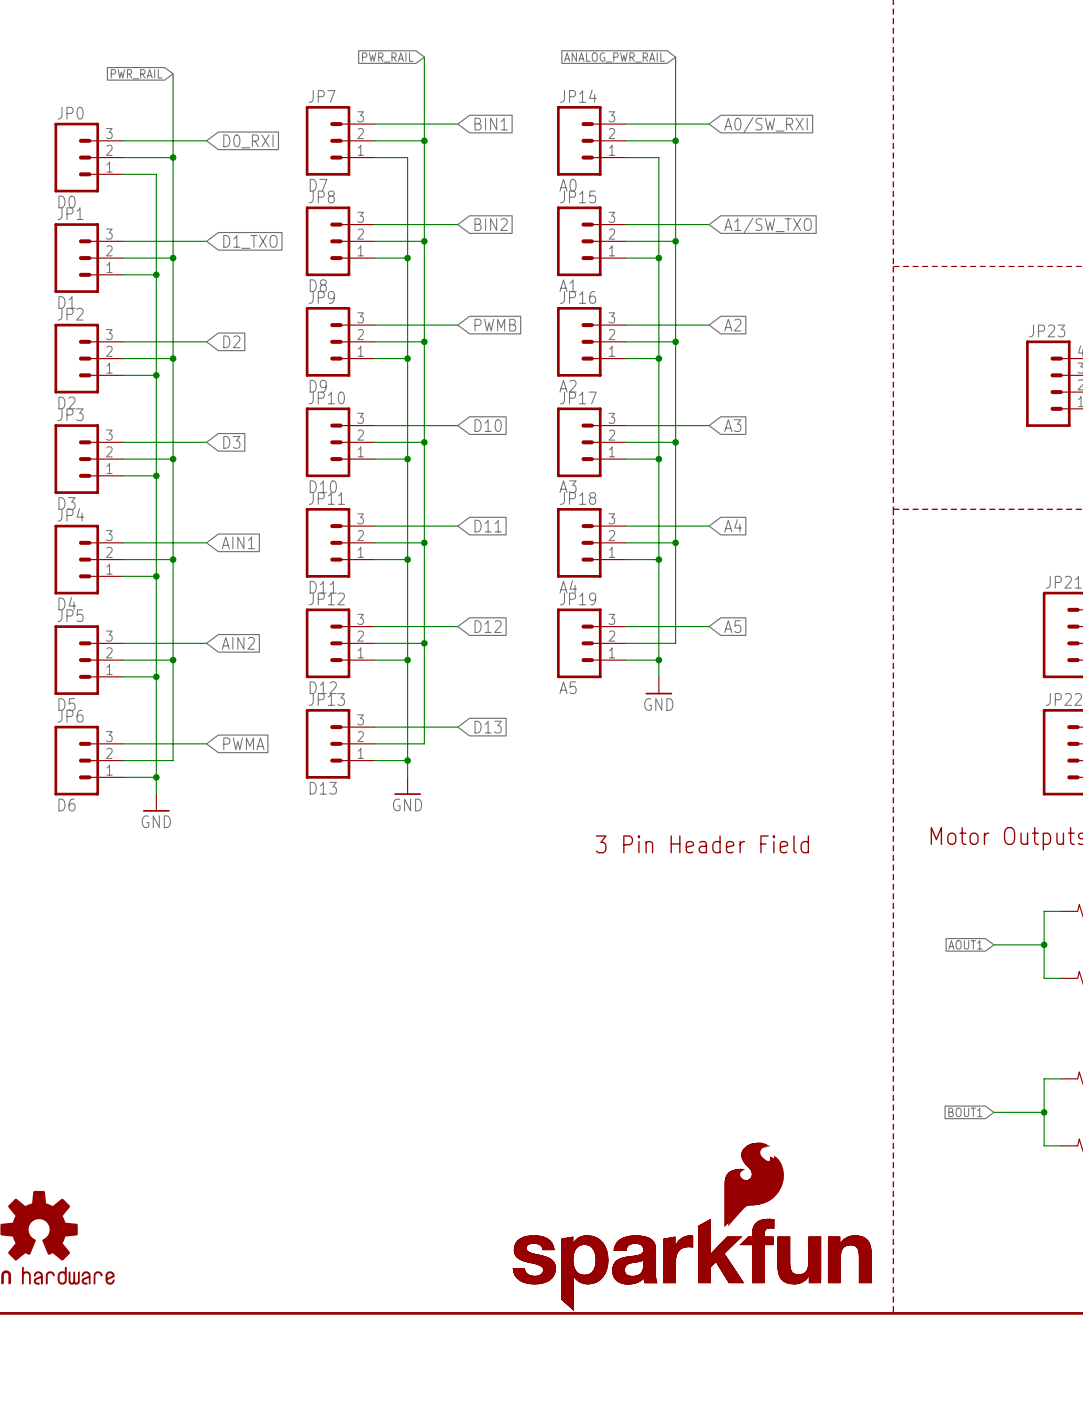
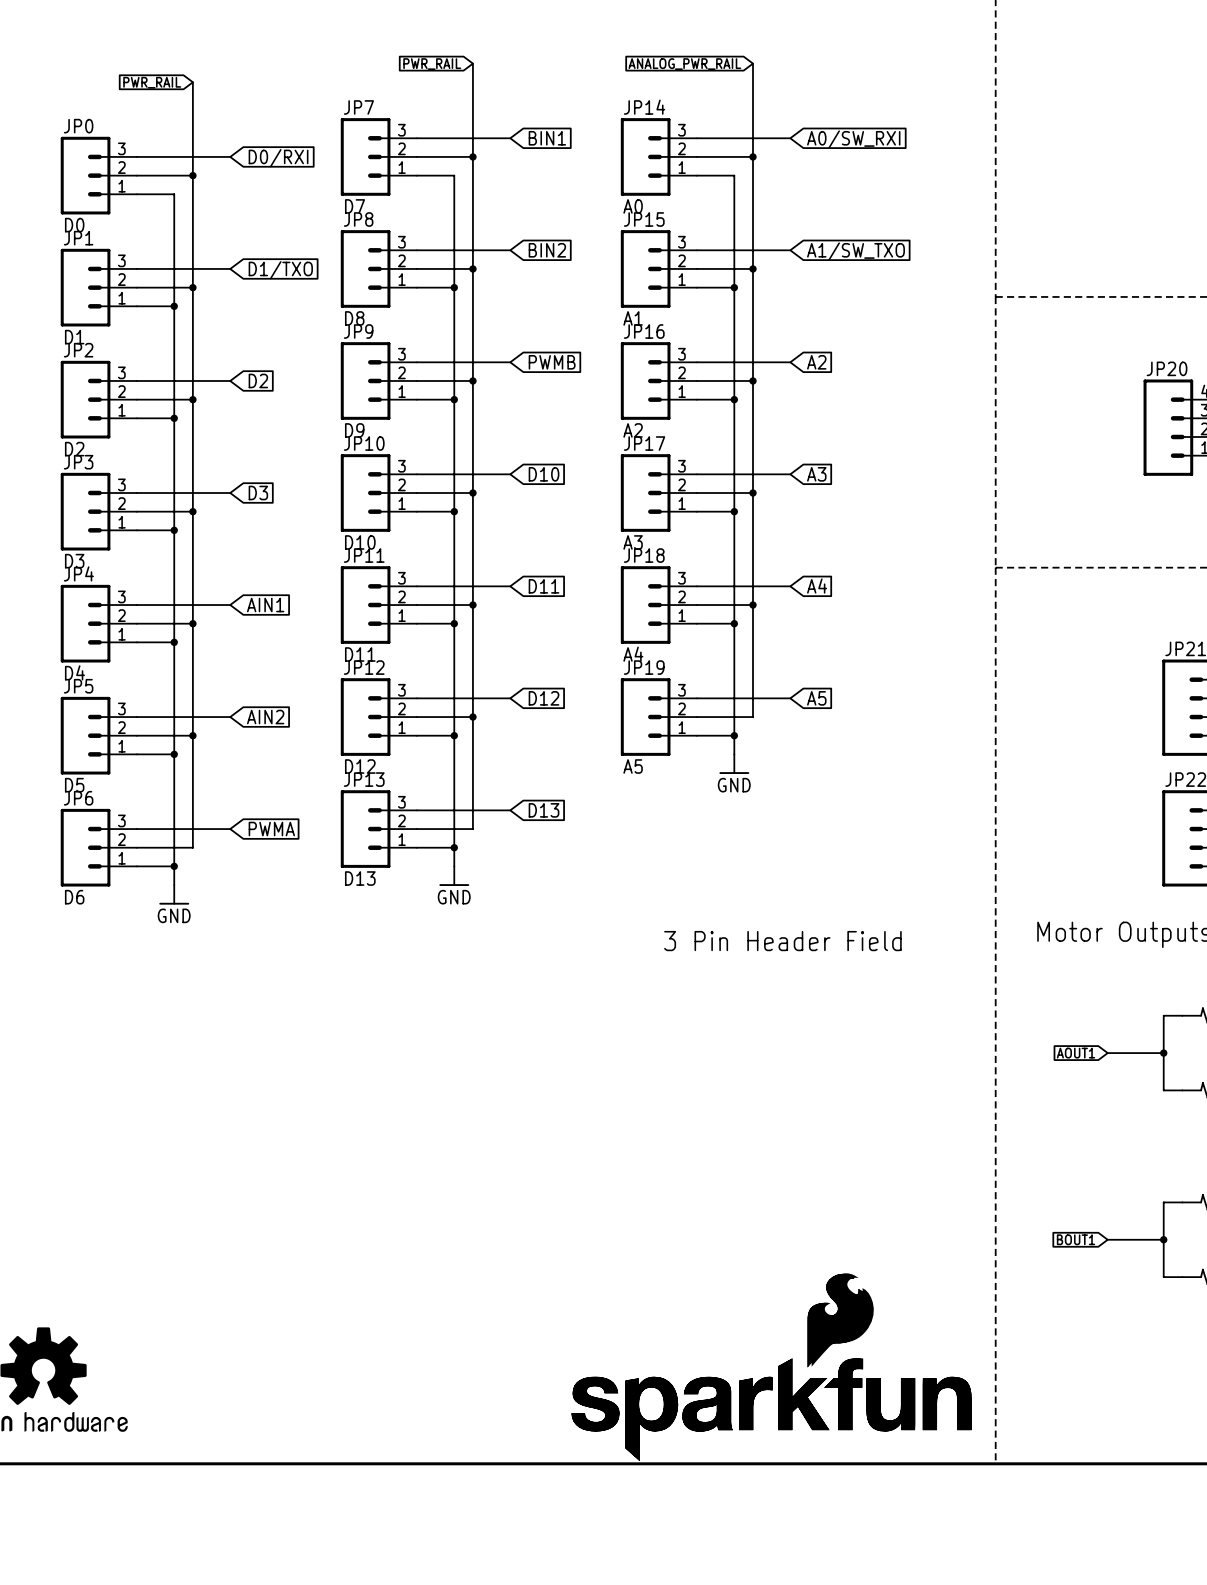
global label: D0_RXI (248, 141) -> D0/RXI (278, 158)
global label: D1_TXO (250, 241) -> D1/TXO (280, 270)
JP23 name: JP23 (1047, 330) -> JP20 (1167, 368)

